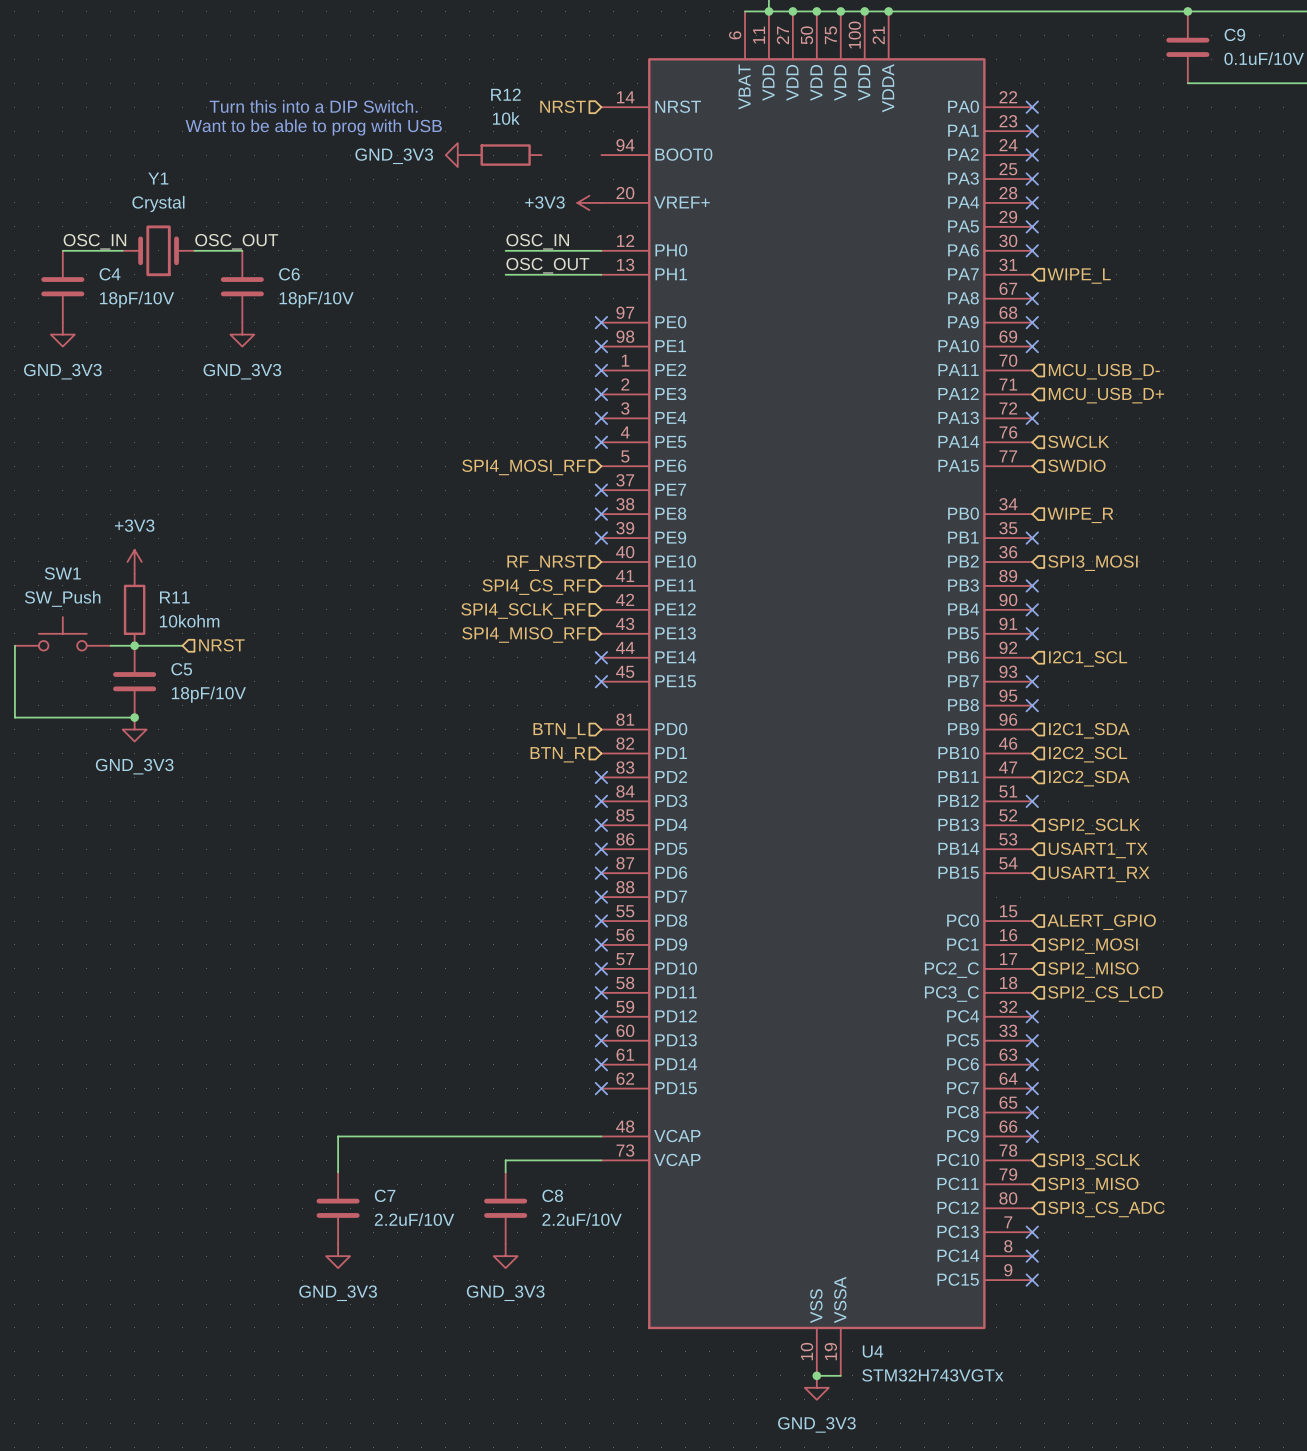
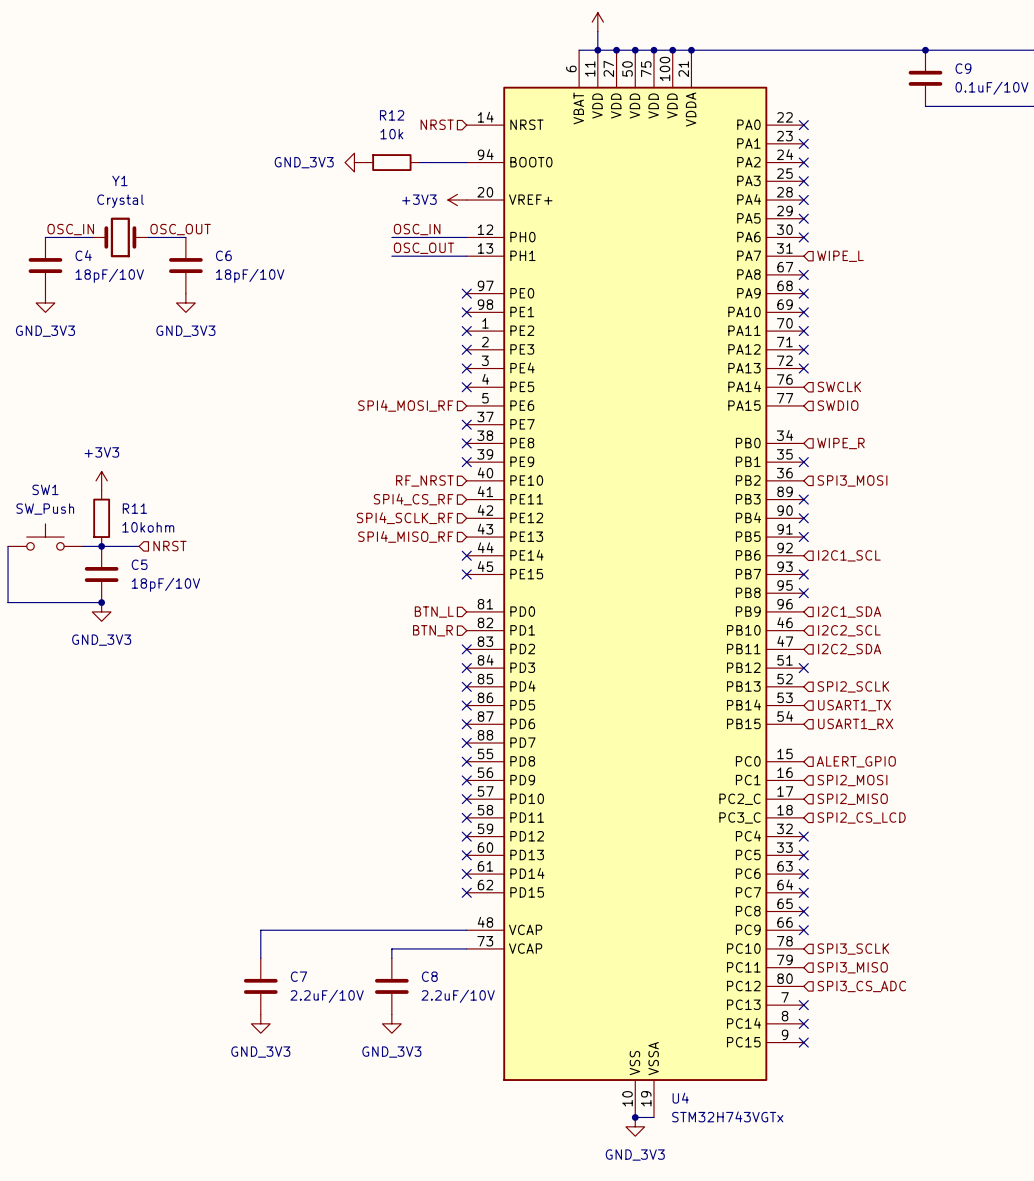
text: Turn this into a DIP Switch. (313, 106) -> none
text: Want to be able to prog with USB (313, 127) -> none
wire: none -> (419, 162) (466, 162)
no-connect mark: none -> (803, 331)
hierarchical label: MCU_USB_D- (1104, 371) -> none
no-connect mark: none -> (803, 349)
hierarchical label: MCU_USB_D+ (1106, 395) -> none

